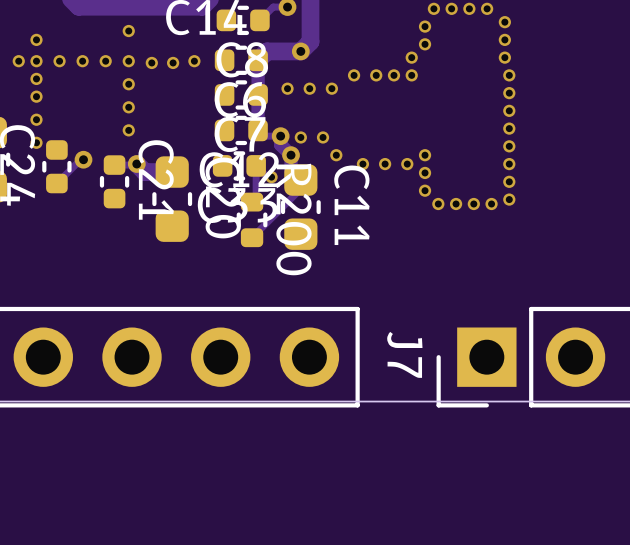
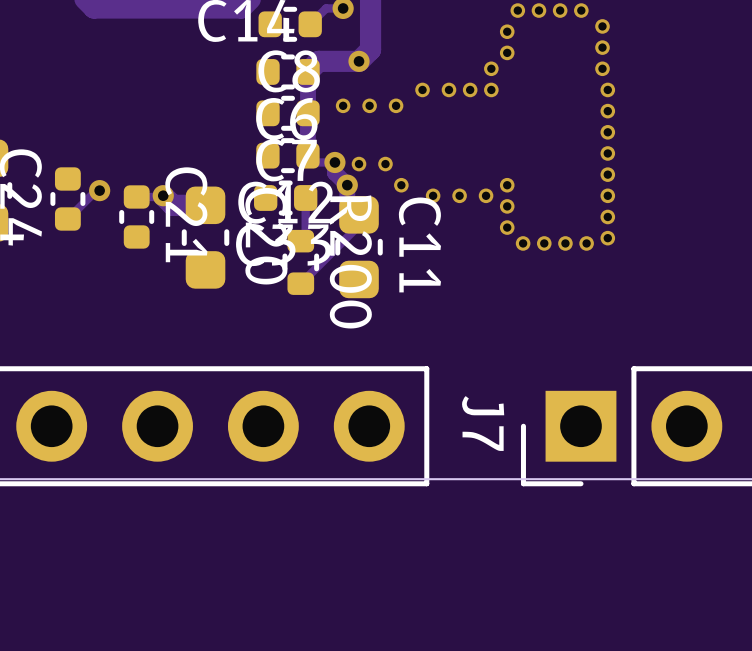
via: (128, 31) -> none
via: (36, 39) -> none
via: (18, 61) -> none
via: (36, 61) -> none
via: (59, 61) -> none
via: (82, 61) -> none
via: (105, 61) -> none
via: (128, 61) -> none
via: (194, 61) -> none
via: (151, 62) -> none
via: (173, 62) -> none
via: (36, 78) -> none
via: (128, 84) -> none
via: (36, 96) -> none
via: (128, 107) -> none
via: (36, 119) -> none
via: (128, 130) -> none
via: (36, 142) -> none
via: (271, 177) -> none

